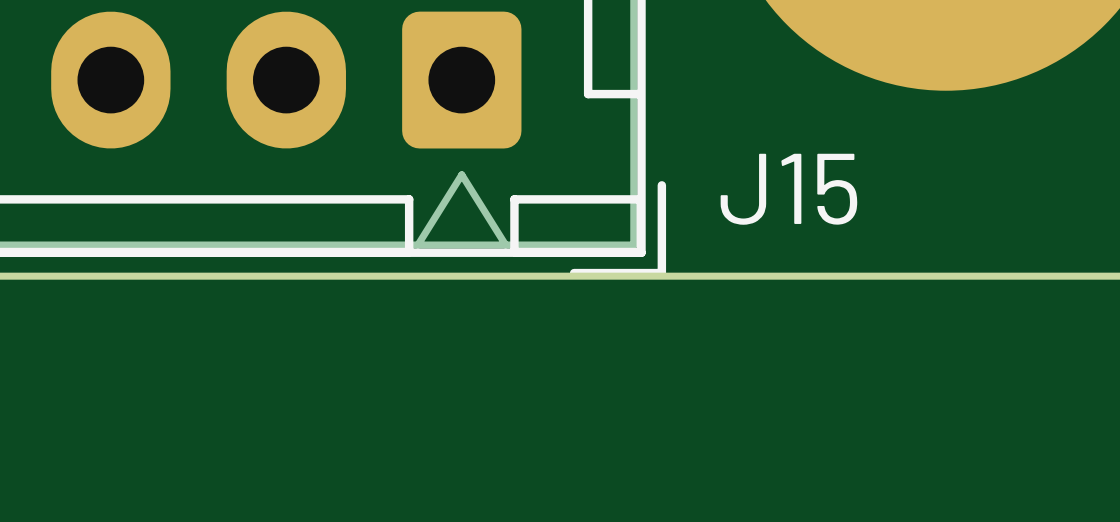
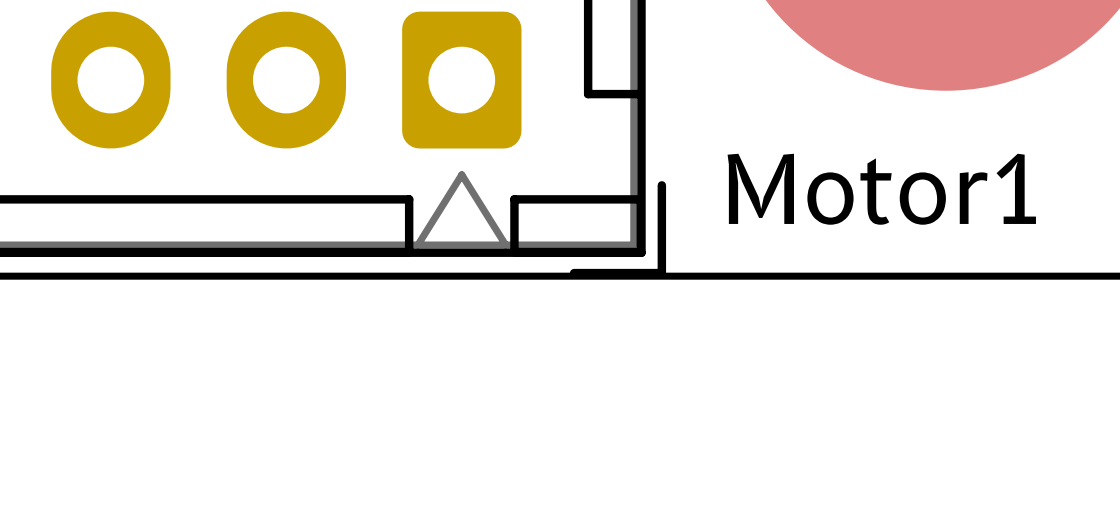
J15 name: J15 (788, 189) -> Motor1 (881, 189)

